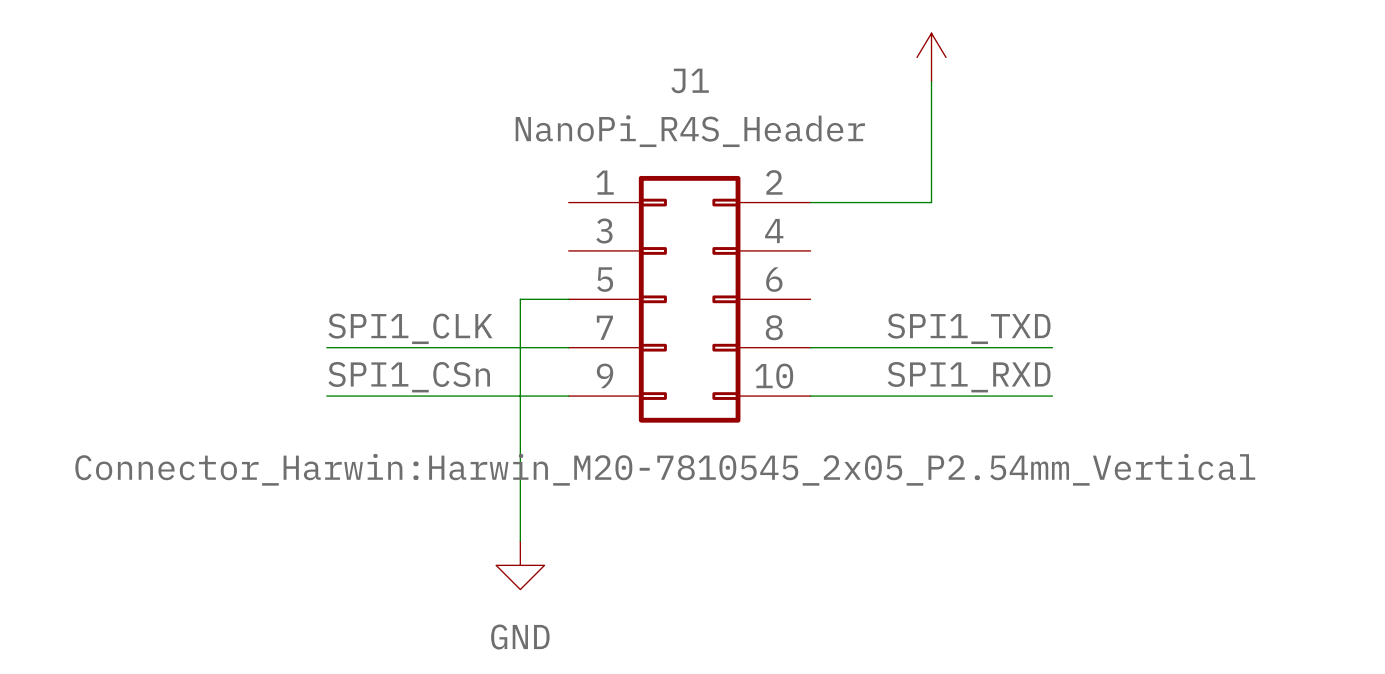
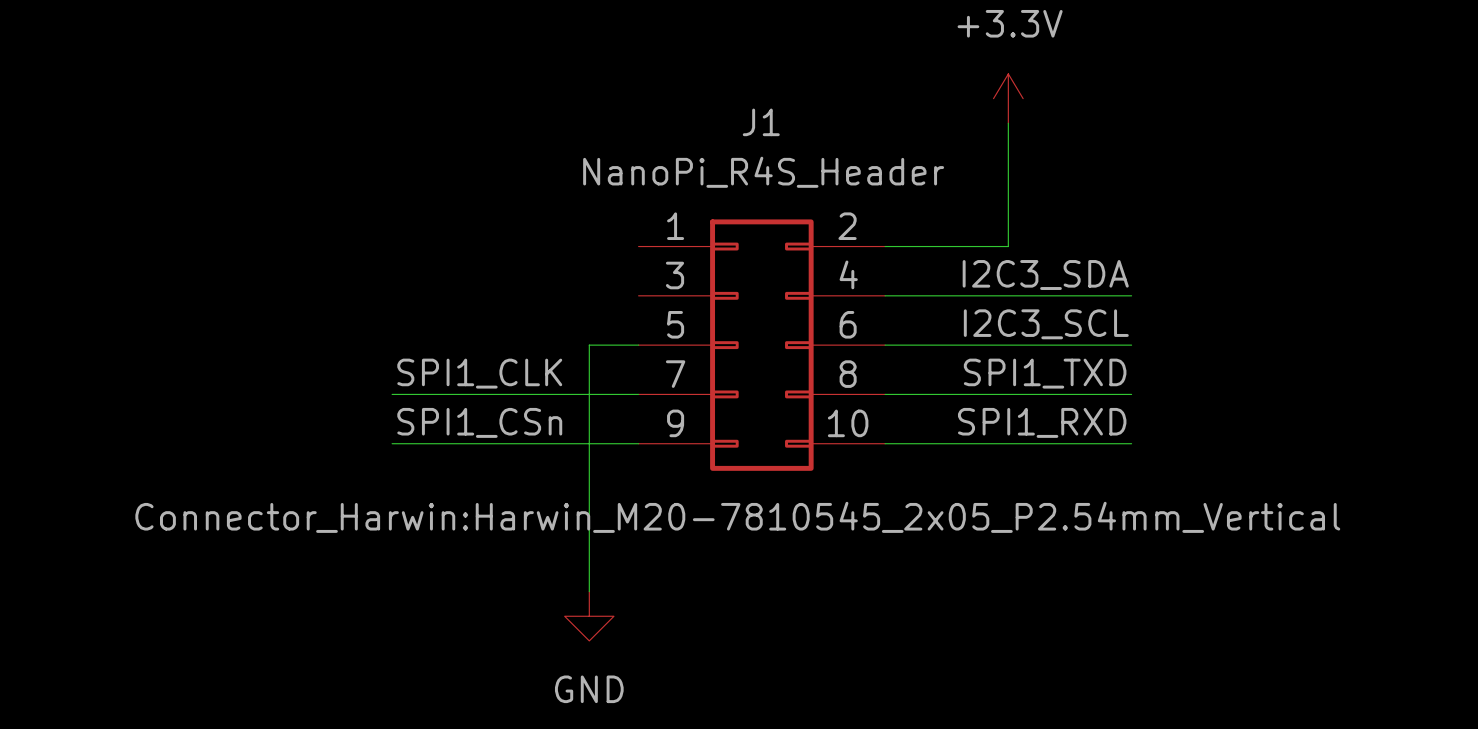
label: none -> I2C3_SDA (1045, 275)
wire: none -> (885, 295) (1131, 295)
label: none -> I2C3_SCL (1046, 324)
wire: none -> (885, 345) (1131, 345)

